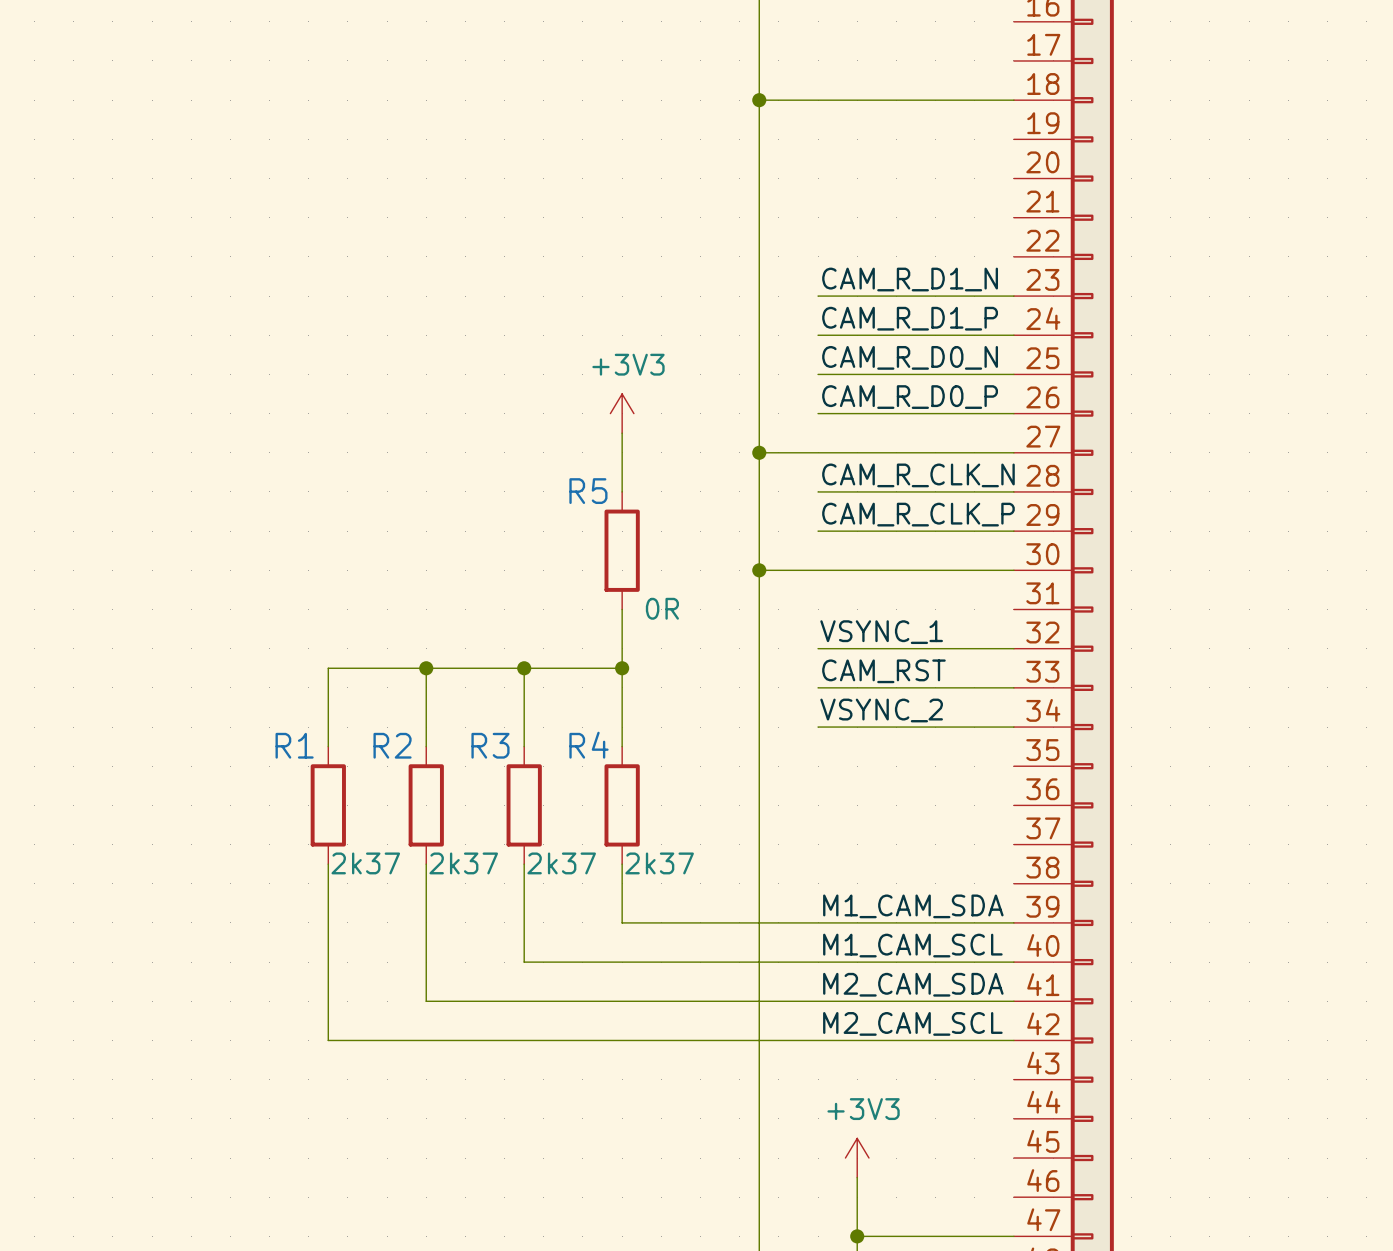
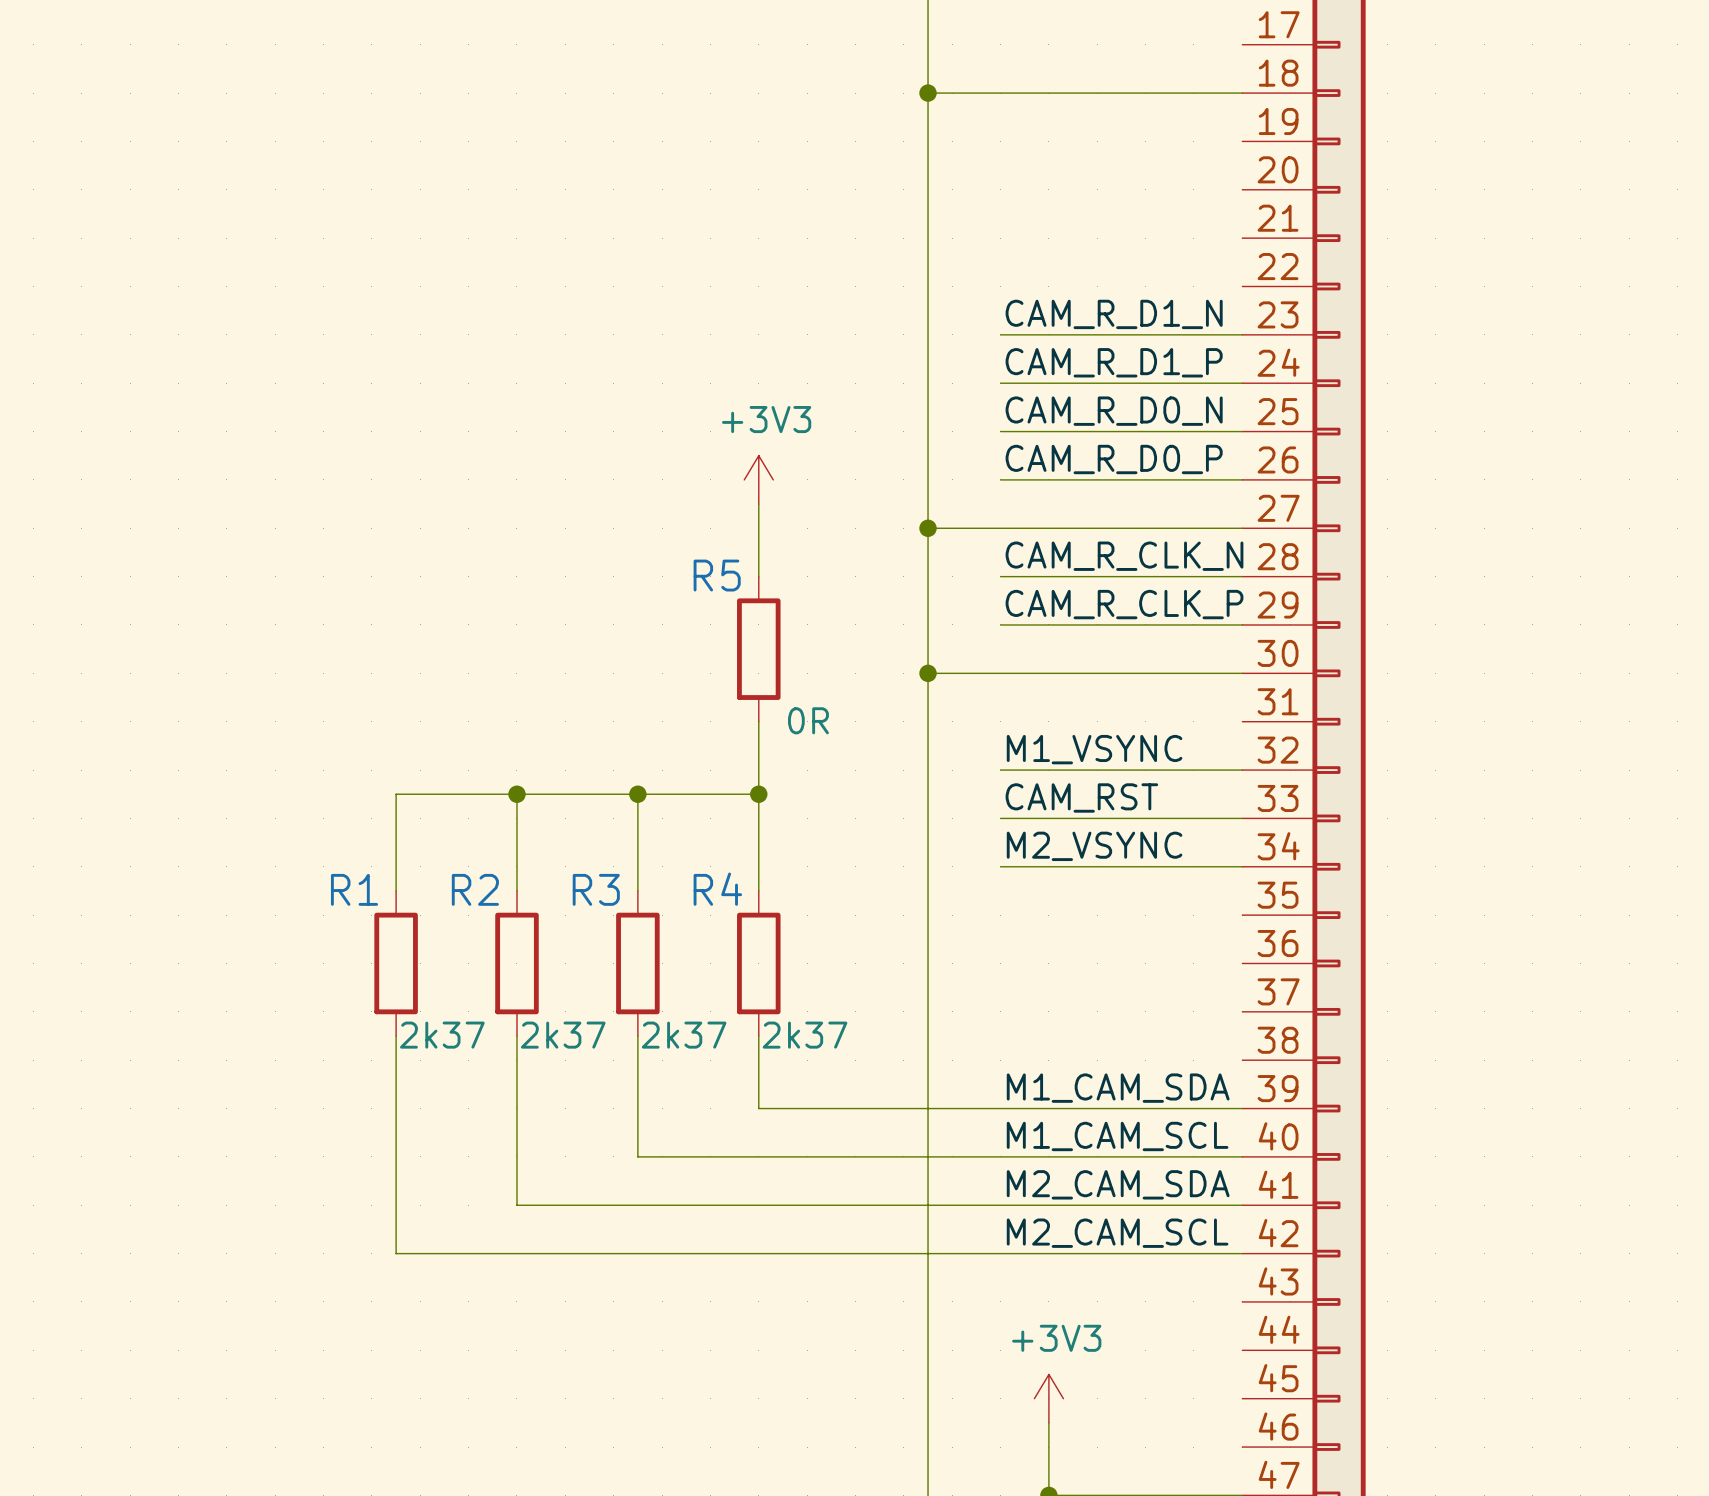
label: VSYNC_1 (881, 632) -> M1_VSYNC (1094, 749)
label: VSYNC_2 (881, 710) -> M2_VSYNC (1094, 846)

